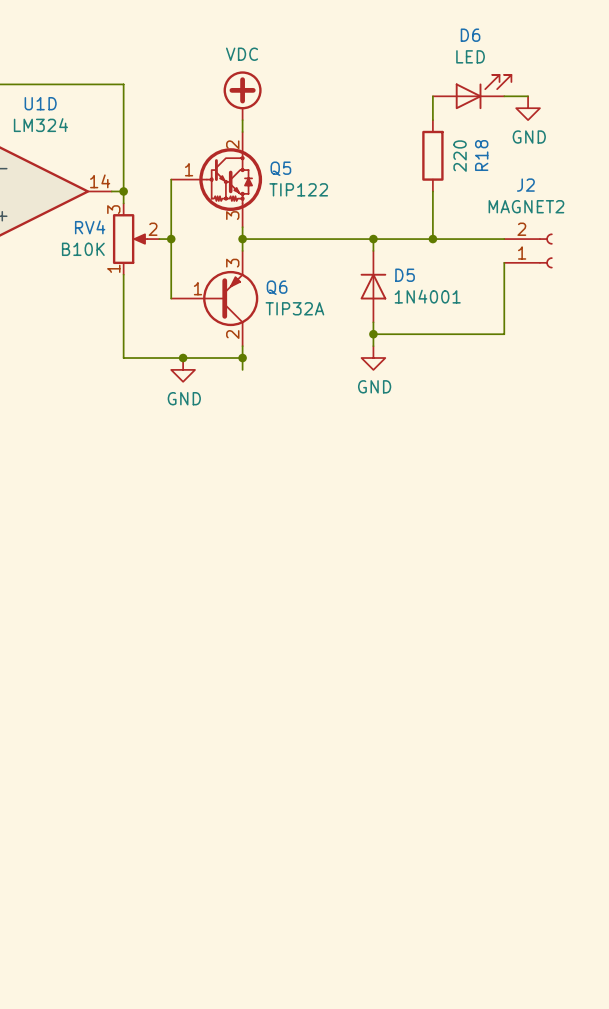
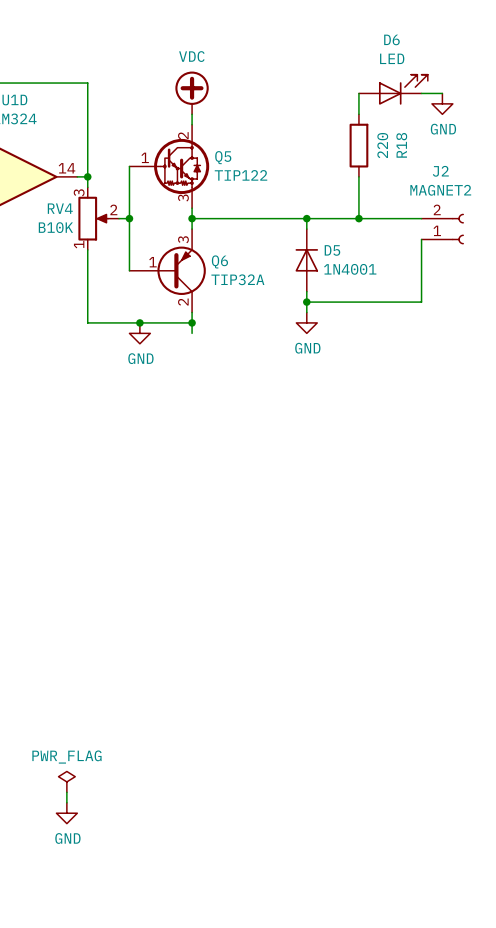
power symbol: none -> PWR_FLAG (66, 781)
wire: none -> (66, 792) (66, 802)
power symbol: none -> GND (66, 813)

